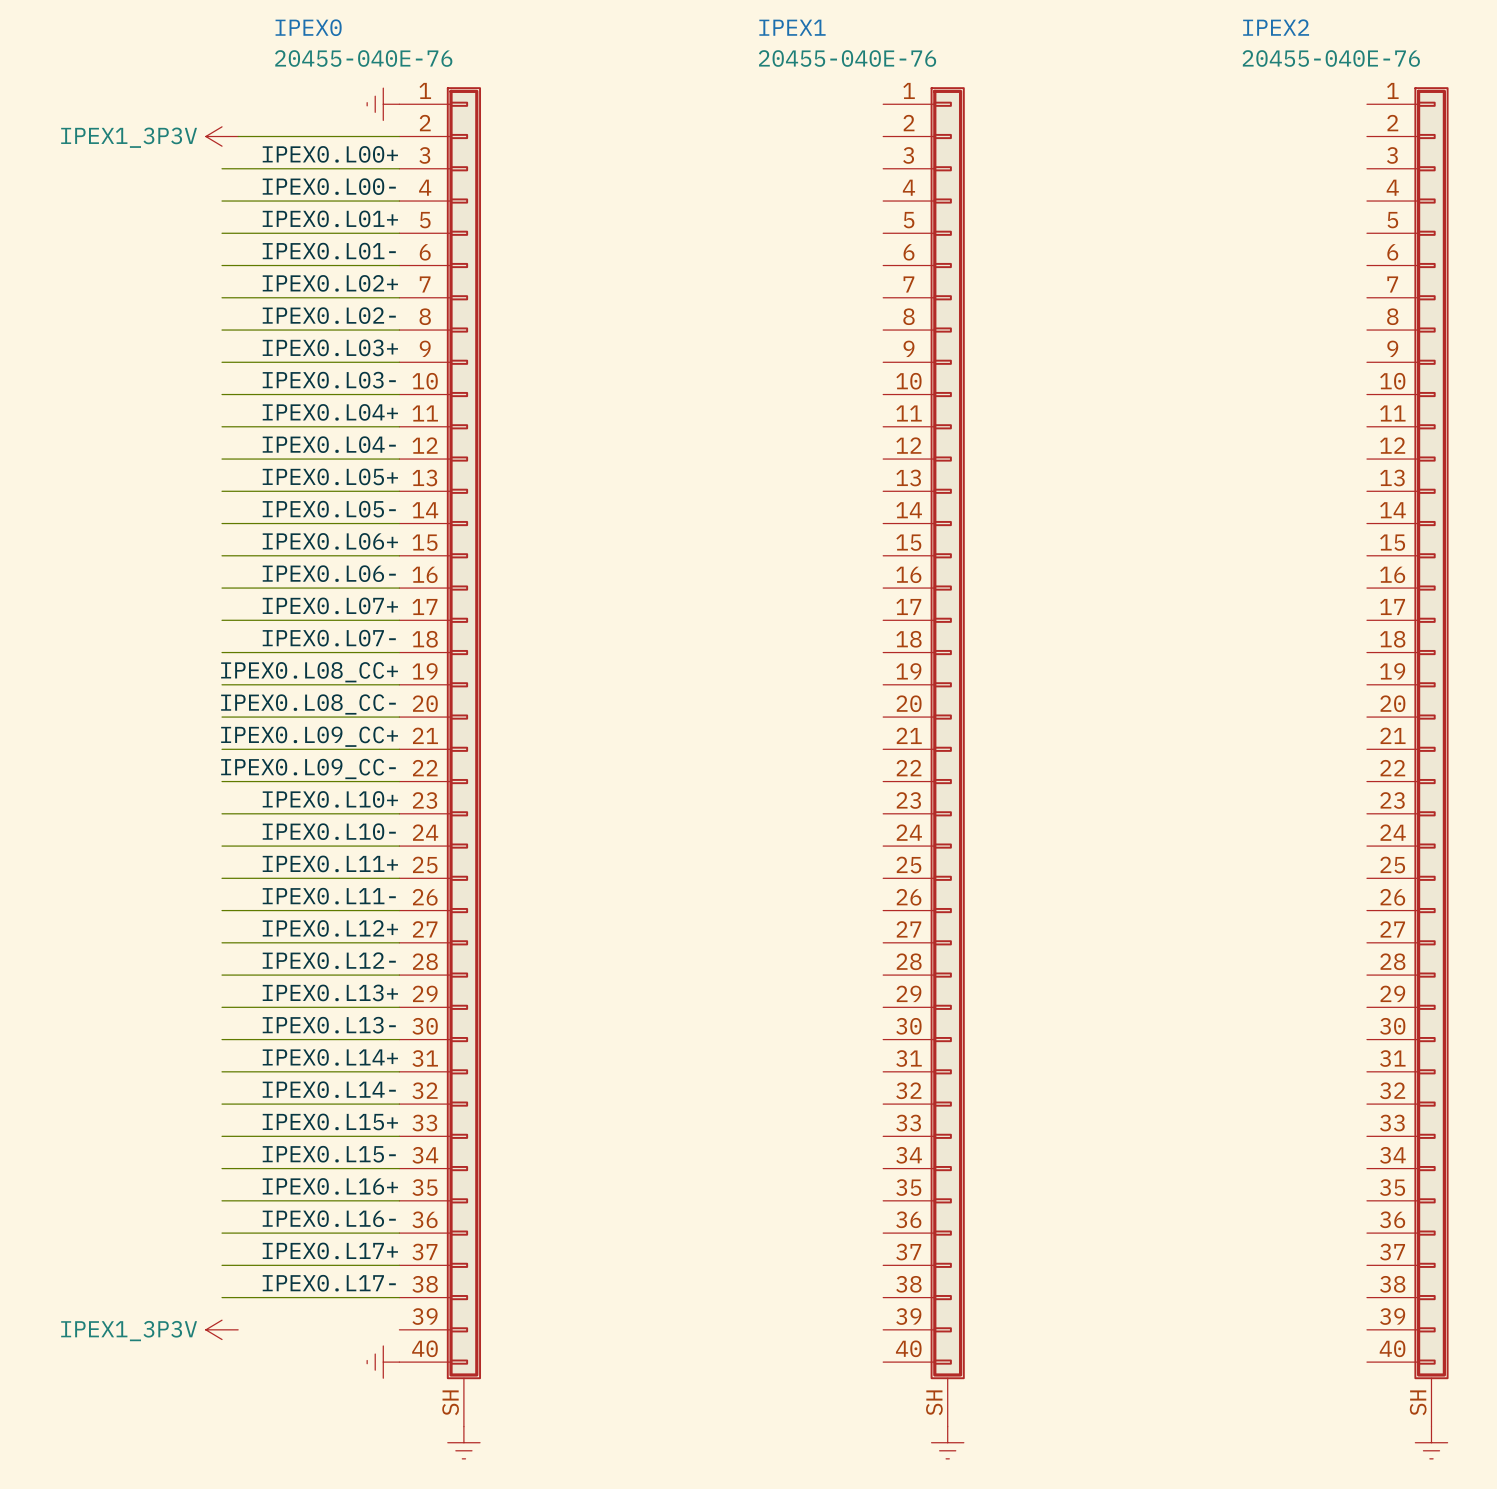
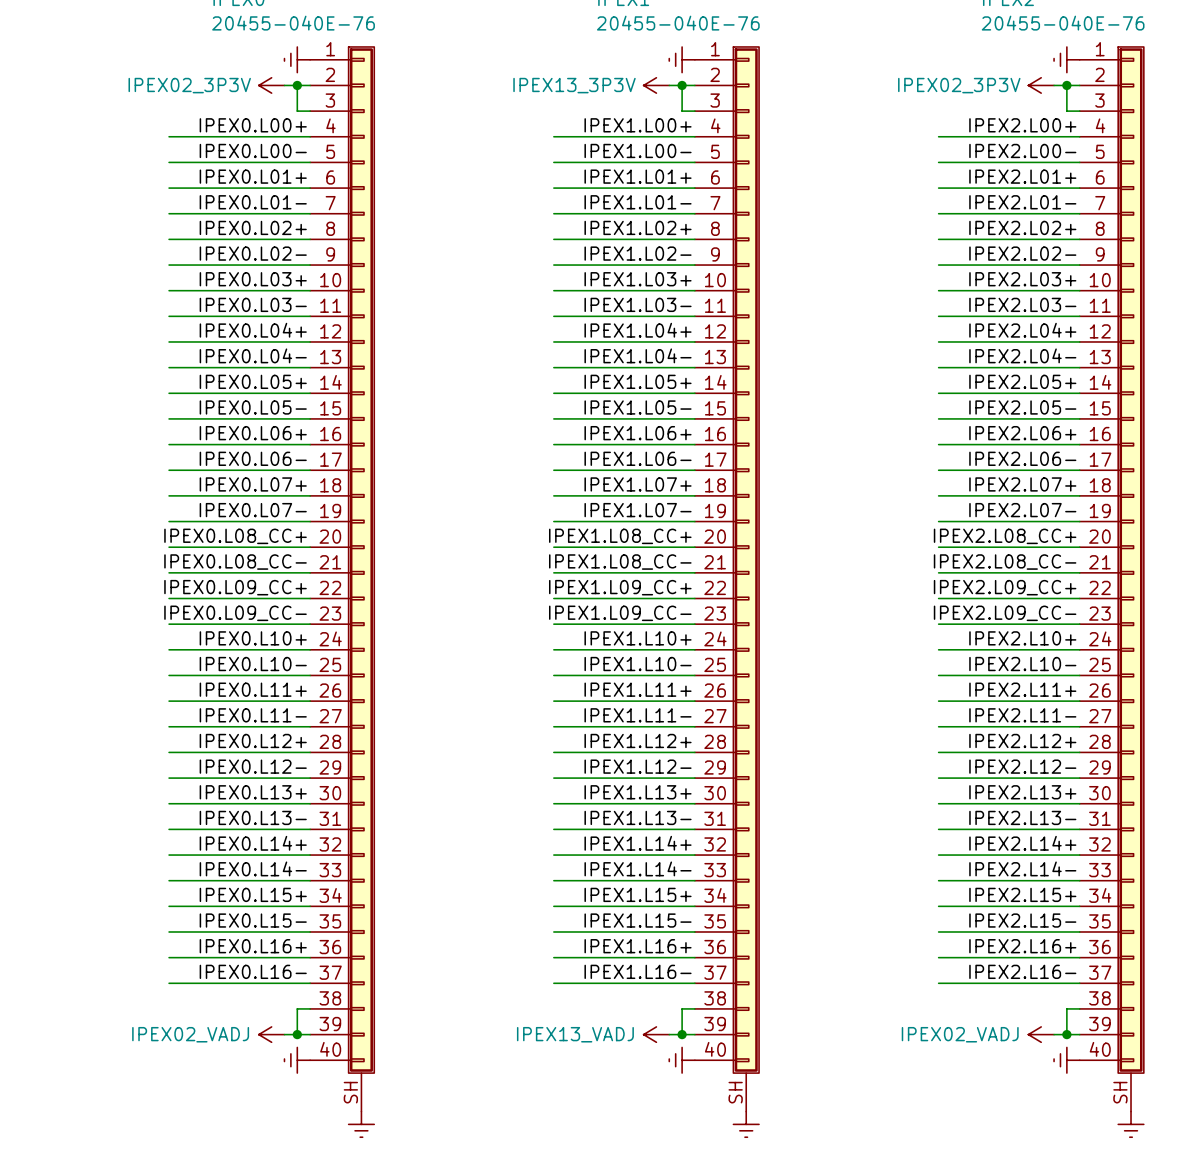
power symbol: none -> (682, 59)
power symbol: none -> (1066, 59)
power symbol: IPEX1_3P3V (222, 136) -> none
wire: (238, 136) (367, 136) -> none
power symbol: none -> IPEX02_3P3V (271, 85)
junction: none -> (297, 85)
power symbol: none -> IPEX13_3P3V (656, 85)
wire: none -> (669, 85) (694, 85)
wire: none -> (682, 85) (682, 111) (694, 111)
junction: none -> (682, 85)
power symbol: none -> IPEX02_3P3V (1041, 85)
wire: none -> (1054, 85) (1079, 85)
wire: none -> (1066, 85) (1066, 111) (1079, 111)
junction: none -> (1066, 85)
label: IPEX0.L00+ (330, 154) -> none
wire: (222, 168) (383, 168) -> (297, 85) (297, 111)
label: IPEX0.L00- (329, 186) -> IPEX0.L00+ (253, 125)
label: none -> IPEX1.L00+ (638, 125)
label: none -> IPEX2.L00+ (1022, 125)
wire: none -> (553, 136) (694, 136)
wire: none -> (938, 136) (1079, 136)
label: IPEX0.L01+ (330, 218) -> IPEX0.L00- (253, 150)
label: none -> IPEX1.L00- (638, 150)
label: none -> IPEX2.L00- (1022, 150)
wire: none -> (553, 162) (694, 162)
wire: none -> (938, 162) (1079, 162)
label: IPEX0.L01- (329, 251) -> IPEX0.L01+ (253, 176)
label: none -> IPEX1.L01+ (638, 176)
label: none -> IPEX2.L01+ (1022, 176)
wire: none -> (553, 188) (694, 188)
wire: none -> (938, 188) (1079, 188)
label: IPEX0.L02+ (330, 283) -> IPEX0.L01- (253, 202)
label: none -> IPEX1.L01- (638, 202)
label: none -> IPEX2.L01- (1022, 202)
wire: none -> (553, 213) (694, 213)
wire: none -> (938, 213) (1079, 213)
label: IPEX0.L02- (329, 315) -> IPEX0.L02+ (253, 227)
label: none -> IPEX1.L02+ (638, 227)
label: none -> IPEX2.L02+ (1022, 227)
wire: none -> (553, 239) (694, 239)
wire: none -> (938, 239) (1079, 239)
label: IPEX0.L03+ (330, 347) -> IPEX0.L02- (253, 253)
label: none -> IPEX1.L02- (638, 253)
label: none -> IPEX2.L02- (1022, 253)
wire: none -> (553, 265) (694, 265)
wire: none -> (938, 265) (1079, 265)
label: IPEX0.L03- (329, 380) -> IPEX0.L03+ (253, 279)
label: none -> IPEX1.L03+ (638, 279)
label: none -> IPEX2.L03+ (1022, 279)
wire: none -> (553, 290) (694, 290)
wire: none -> (938, 290) (1079, 290)
label: IPEX0.L04+ (330, 412) -> IPEX0.L03- (253, 304)
label: none -> IPEX1.L03- (638, 304)
label: none -> IPEX2.L03- (1022, 304)
wire: none -> (553, 316) (694, 316)
wire: none -> (938, 316) (1079, 316)
label: IPEX0.L04- (329, 444) -> IPEX0.L04+ (253, 330)
label: none -> IPEX1.L04+ (638, 330)
label: none -> IPEX2.L04+ (1022, 330)
wire: none -> (553, 341) (694, 341)
wire: none -> (938, 341) (1079, 341)
label: IPEX0.L05+ (330, 476) -> IPEX0.L04- (253, 355)
label: none -> IPEX1.L04- (638, 355)
label: none -> IPEX2.L04- (1022, 355)
wire: none -> (553, 367) (694, 367)
wire: none -> (938, 367) (1079, 367)
label: IPEX0.L05- (329, 509) -> IPEX0.L05+ (253, 381)
label: none -> IPEX1.L05+ (638, 381)
label: none -> IPEX2.L05+ (1022, 381)
wire: none -> (553, 393) (694, 393)
wire: none -> (938, 393) (1079, 393)
label: IPEX0.L06+ (330, 541) -> IPEX0.L05- (253, 407)
label: none -> IPEX1.L05- (638, 407)
label: none -> IPEX2.L05- (1022, 407)
wire: none -> (553, 418) (694, 418)
wire: none -> (938, 418) (1079, 418)
label: IPEX0.L06- (329, 573) -> IPEX0.L06+ (253, 433)
label: none -> IPEX1.L06+ (638, 433)
label: none -> IPEX2.L06+ (1022, 433)
wire: none -> (553, 444) (694, 444)
wire: none -> (938, 444) (1079, 444)
label: IPEX0.L07+ (330, 605) -> IPEX0.L06- (253, 458)
label: none -> IPEX1.L06- (638, 458)
label: none -> IPEX2.L06- (1022, 458)
wire: none -> (553, 470) (694, 470)
wire: none -> (938, 470) (1079, 470)
label: IPEX0.L07- (329, 638) -> IPEX0.L07+ (253, 484)
label: none -> IPEX1.L07+ (638, 484)
label: none -> IPEX2.L07+ (1022, 484)
wire: none -> (553, 495) (694, 495)
wire: none -> (938, 495) (1079, 495)
label: none -> IPEX1.L07- (638, 510)
label: none -> IPEX2.L07- (1022, 510)
label: IPEX0.L08_CC+ (309, 672) -> IPEX0.L07- (253, 510)
wire: none -> (553, 521) (694, 521)
wire: none -> (938, 521) (1079, 521)
label: IPEX0.L08_CC- (308, 704) -> IPEX0.L08_CC+ (235, 536)
label: none -> IPEX1.L08_CC+ (620, 536)
label: none -> IPEX2.L08_CC+ (1005, 536)
wire: none -> (553, 547) (694, 547)
wire: none -> (938, 547) (1079, 547)
label: IPEX0.L09_CC+ (309, 736) -> IPEX0.L08_CC- (235, 562)
label: none -> IPEX1.L08_CC- (620, 562)
label: none -> IPEX2.L08_CC- (1005, 562)
wire: none -> (553, 572) (694, 572)
wire: none -> (938, 572) (1079, 572)
label: IPEX0.L09_CC- (308, 768) -> IPEX0.L09_CC+ (235, 587)
label: none -> IPEX1.L09_CC+ (620, 587)
label: none -> IPEX2.L09_CC+ (1005, 587)
wire: none -> (553, 598) (694, 598)
wire: none -> (938, 598) (1079, 598)
label: IPEX0.L10+ (330, 799) -> IPEX0.L09_CC- (235, 613)
label: none -> IPEX1.L09_CC- (620, 613)
label: none -> IPEX2.L09_CC- (1005, 613)
wire: none -> (553, 624) (694, 624)
wire: none -> (938, 624) (1079, 624)
label: IPEX0.L10- (329, 831) -> IPEX0.L10+ (253, 638)
label: none -> IPEX1.L10+ (638, 638)
label: none -> IPEX2.L10+ (1022, 638)
wire: none -> (553, 649) (694, 649)
wire: none -> (938, 649) (1079, 649)
label: IPEX0.L11+ (330, 863) -> IPEX0.L10- (253, 664)
label: none -> IPEX1.L10- (638, 664)
label: none -> IPEX2.L10- (1022, 664)
wire: none -> (553, 675) (694, 675)
wire: none -> (938, 675) (1079, 675)
label: IPEX0.L11- (329, 896) -> IPEX0.L11+ (253, 689)
label: none -> IPEX1.L11+ (638, 689)
label: none -> IPEX2.L11+ (1022, 689)
wire: none -> (553, 701) (694, 701)
wire: none -> (938, 701) (1079, 701)
label: IPEX0.L12+ (330, 928) -> IPEX0.L11- (253, 715)
label: none -> IPEX1.L11- (638, 715)
label: none -> IPEX2.L11- (1022, 715)
wire: none -> (553, 726) (694, 726)
wire: none -> (938, 726) (1079, 726)
label: IPEX0.L12- (329, 960) -> IPEX0.L12+ (253, 740)
label: none -> IPEX1.L12+ (638, 740)
label: none -> IPEX2.L12+ (1022, 740)
wire: none -> (553, 752) (694, 752)
wire: none -> (938, 752) (1079, 752)
label: IPEX0.L13+ (330, 992) -> IPEX0.L12- (253, 766)
label: none -> IPEX1.L12- (638, 766)
label: none -> IPEX2.L12- (1022, 766)
wire: none -> (553, 778) (694, 778)
wire: none -> (938, 778) (1079, 778)
label: IPEX0.L13- (329, 1025) -> IPEX0.L13+ (253, 792)
label: none -> IPEX1.L13+ (638, 792)
label: none -> IPEX2.L13+ (1022, 792)
wire: none -> (553, 803) (694, 803)
wire: none -> (938, 803) (1079, 803)
label: IPEX0.L14+ (330, 1057) -> IPEX0.L13- (253, 817)
label: none -> IPEX1.L13- (638, 817)
label: none -> IPEX2.L13- (1022, 817)
wire: none -> (553, 829) (694, 829)
wire: none -> (938, 829) (1079, 829)
label: IPEX0.L14- (329, 1089) -> IPEX0.L14+ (253, 843)
label: none -> IPEX1.L14+ (638, 843)
label: none -> IPEX2.L14+ (1022, 843)
wire: none -> (553, 855) (694, 855)
wire: none -> (938, 855) (1079, 855)
label: IPEX0.L15+ (330, 1121) -> IPEX0.L14- (253, 868)
label: none -> IPEX2.L14- (1022, 868)
label: none -> IPEX1.L14- (638, 868)
wire: none -> (553, 880) (694, 880)
wire: none -> (938, 880) (1079, 880)
label: IPEX0.L15- (329, 1154) -> IPEX0.L15+ (253, 894)
label: none -> IPEX1.L15+ (638, 894)
label: none -> IPEX2.L15+ (1022, 894)
wire: none -> (553, 906) (694, 906)
wire: none -> (938, 906) (1079, 906)
label: IPEX0.L16+ (330, 1186) -> IPEX0.L15- (253, 920)
label: none -> IPEX1.L15- (638, 920)
label: none -> IPEX2.L15- (1022, 920)
wire: none -> (553, 931) (694, 931)
wire: none -> (938, 931) (1079, 931)
label: IPEX0.L16- (329, 1218) -> IPEX0.L16+ (253, 946)
label: none -> IPEX1.L16+ (638, 946)
label: none -> IPEX2.L16+ (1022, 946)
wire: none -> (553, 957) (694, 957)
wire: none -> (938, 957) (1079, 957)
label: IPEX0.L17+ (330, 1250) -> IPEX0.L16- (253, 971)
label: none -> IPEX2.L16- (1022, 971)
label: none -> IPEX1.L16- (638, 971)
wire: none -> (553, 983) (694, 983)
wire: none -> (938, 983) (1079, 983)
label: IPEX0.L17- (329, 1283) -> none
wire: (222, 1297) (383, 1297) -> (297, 1034) (297, 1008)
wire: none -> (694, 1008) (682, 1008) (682, 1034)
wire: none -> (1079, 1008) (1066, 1008) (1066, 1034)
power symbol: IPEX1_3P3V (222, 1329) -> none
power symbol: none -> IPEX02_VADJ (271, 1034)
wire: none -> (284, 1034) (310, 1034)
junction: none -> (297, 1034)
power symbol: none -> IPEX13_VADJ (656, 1034)
wire: none -> (669, 1034) (694, 1034)
junction: none -> (682, 1034)
power symbol: none -> IPEX02_VADJ (1041, 1034)
wire: none -> (1054, 1034) (1079, 1034)
junction: none -> (1066, 1034)
power symbol: none -> (682, 1060)
power symbol: none -> (1066, 1060)

